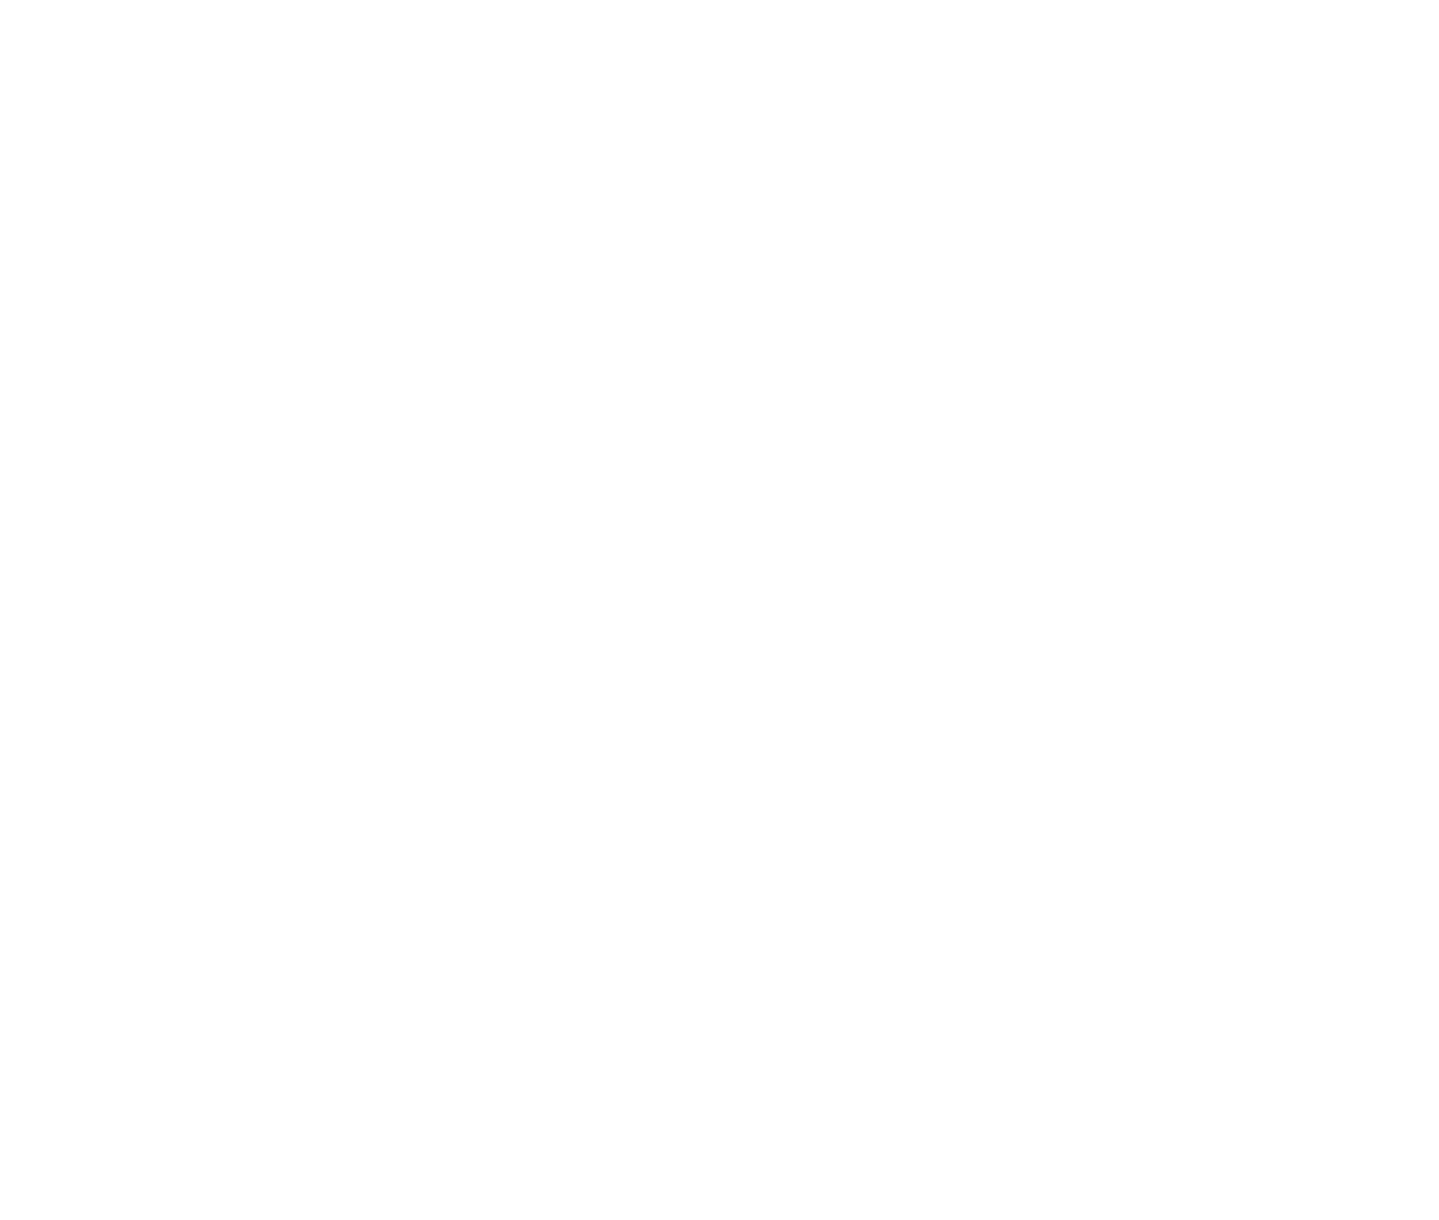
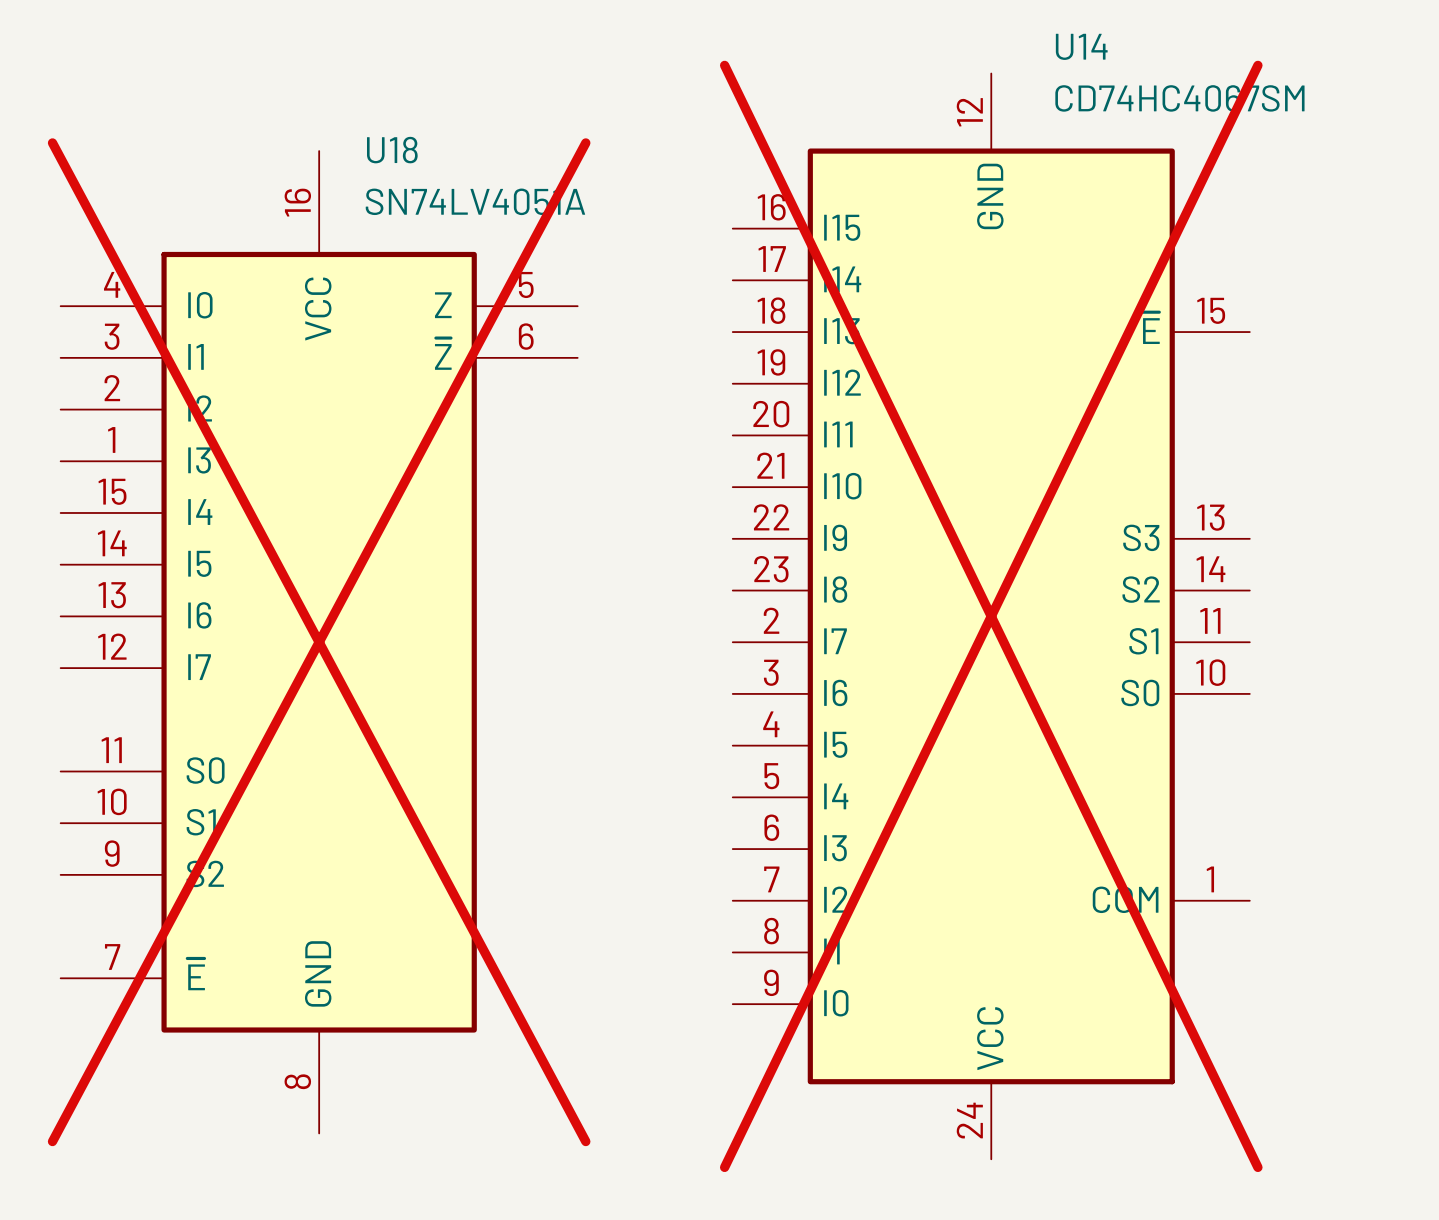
U14: none -> CD74HC4067SM (991, 616)
U18: none -> SN74LV4051A (319, 642)

